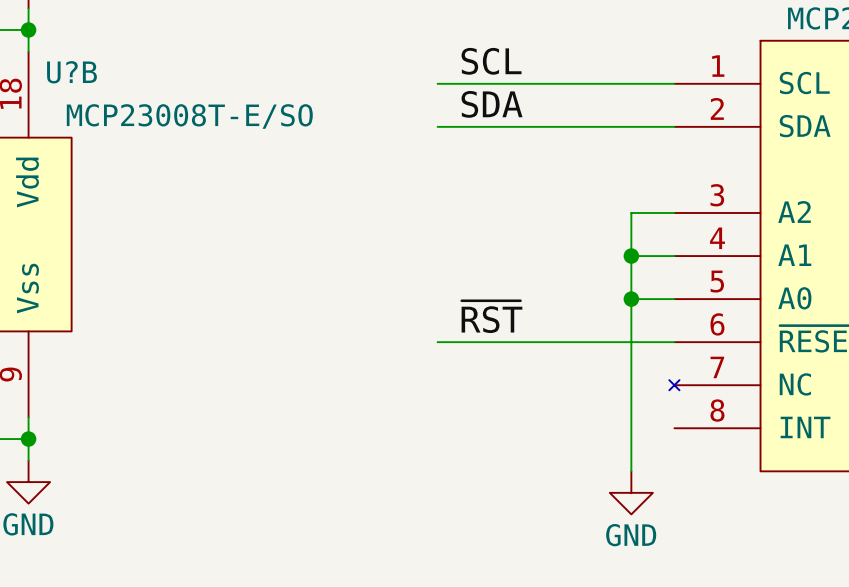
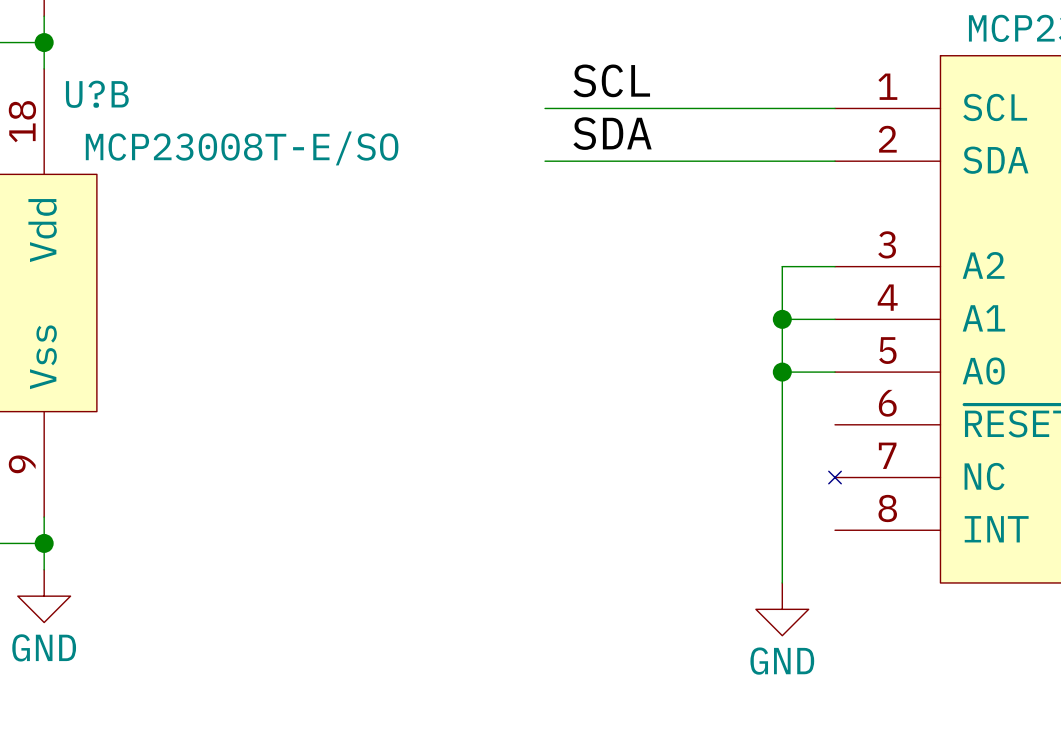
label: ~{RST} (491, 316) -> none
wire: (437, 342) (674, 342) -> none

